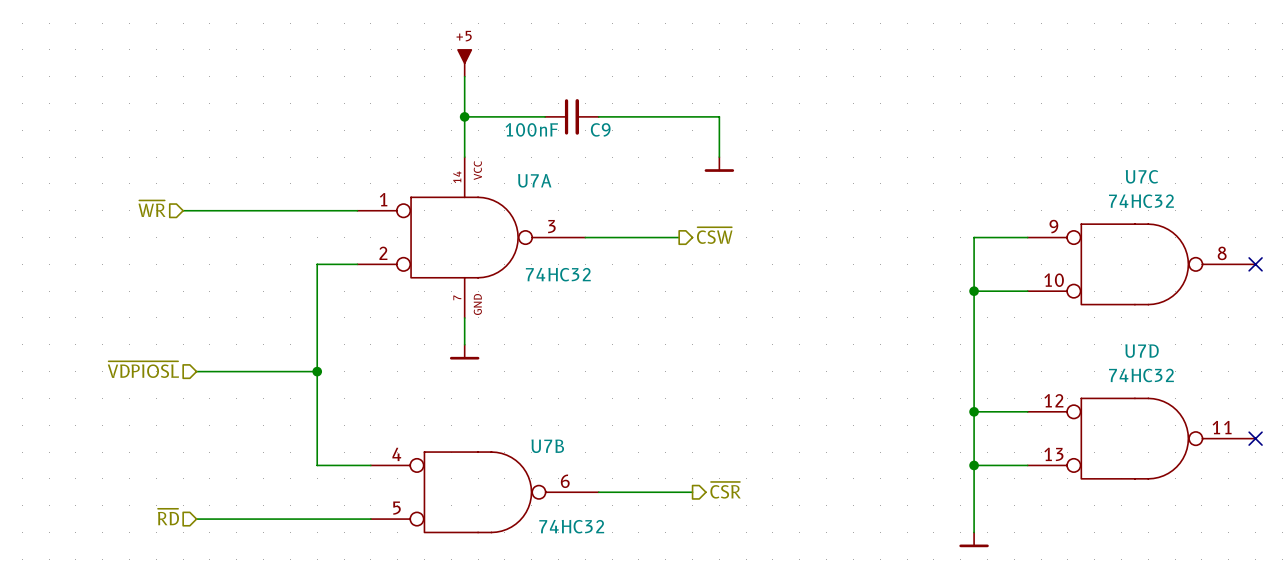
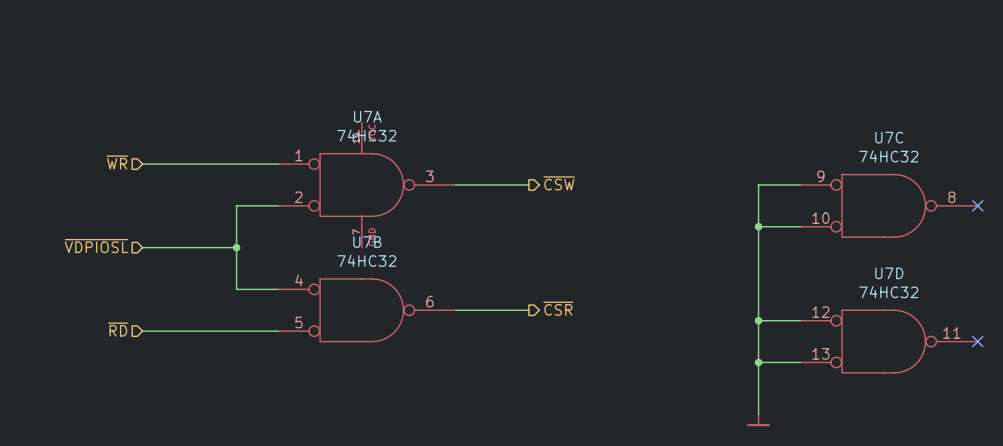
power symbol: (464, 63) -> none
wire: (464, 76) (464, 157) -> none
wire: (464, 116) (545, 116) -> none
junction: (464, 116) -> none
C9: 100nF (571, 116) -> none
wire: (598, 116) (719, 116) (719, 157) -> none
power symbol: (719, 164) -> none
U7A name position: U7A (534, 180) -> U7A (367, 116)
wire: (317, 264) (317, 465) (370, 465) -> (247, 205) (236, 205) (236, 289)
U7A value position: 74HC32 (558, 274) -> 74HC32 (366, 135)
wire: none -> (142, 247) (236, 247)
wire: (464, 317) (464, 344) -> none
power symbol: (464, 352) -> none
hierarchical label position: ~{VDPIOSL} (143, 369) -> ~{VDPIOSL} (96, 246)
wire: (196, 371) (303, 371) -> none
wire: none -> (247, 289) (278, 289)
junction position: (317, 371) -> (236, 247)
U7B name position: U7B (547, 446) -> U7B (367, 242)
hierarchical label position: ~{CSR} (725, 490) -> ~{CSR} (558, 308)
U7B position: (484, 492) -> (367, 310)
wire: (598, 492) (692, 492) -> (455, 310) (528, 310)
hierarchical label position: ~{RD} (168, 517) -> ~{RD} (118, 329)
wire: (196, 519) (370, 519) -> (142, 331) (278, 331)
U7B value position: 74HC32 (571, 526) -> 74HC32 (366, 260)

